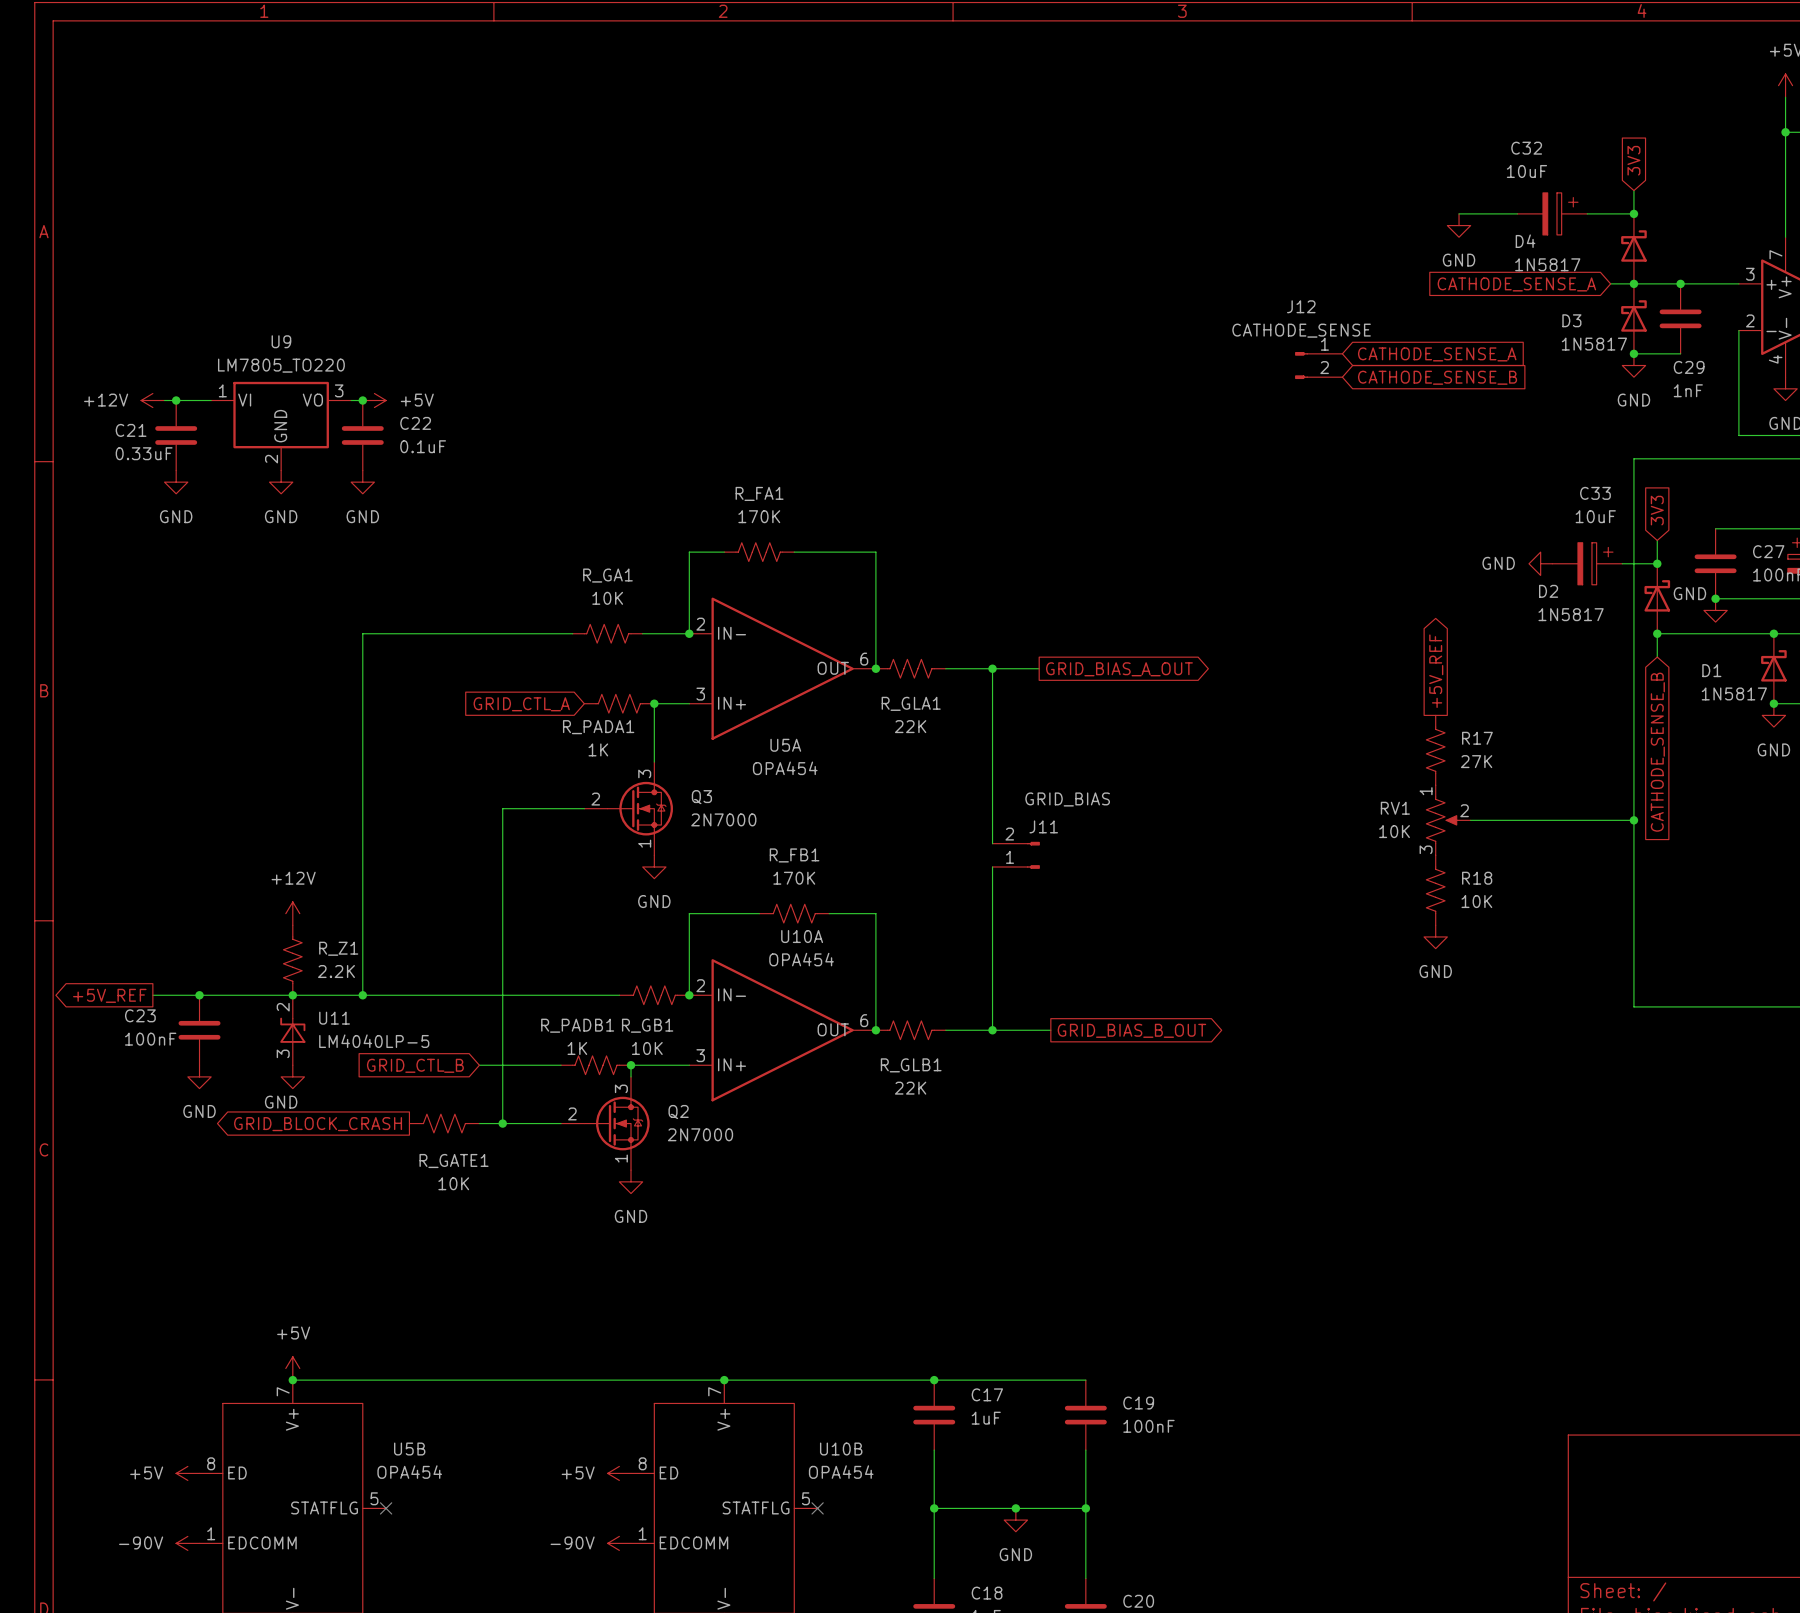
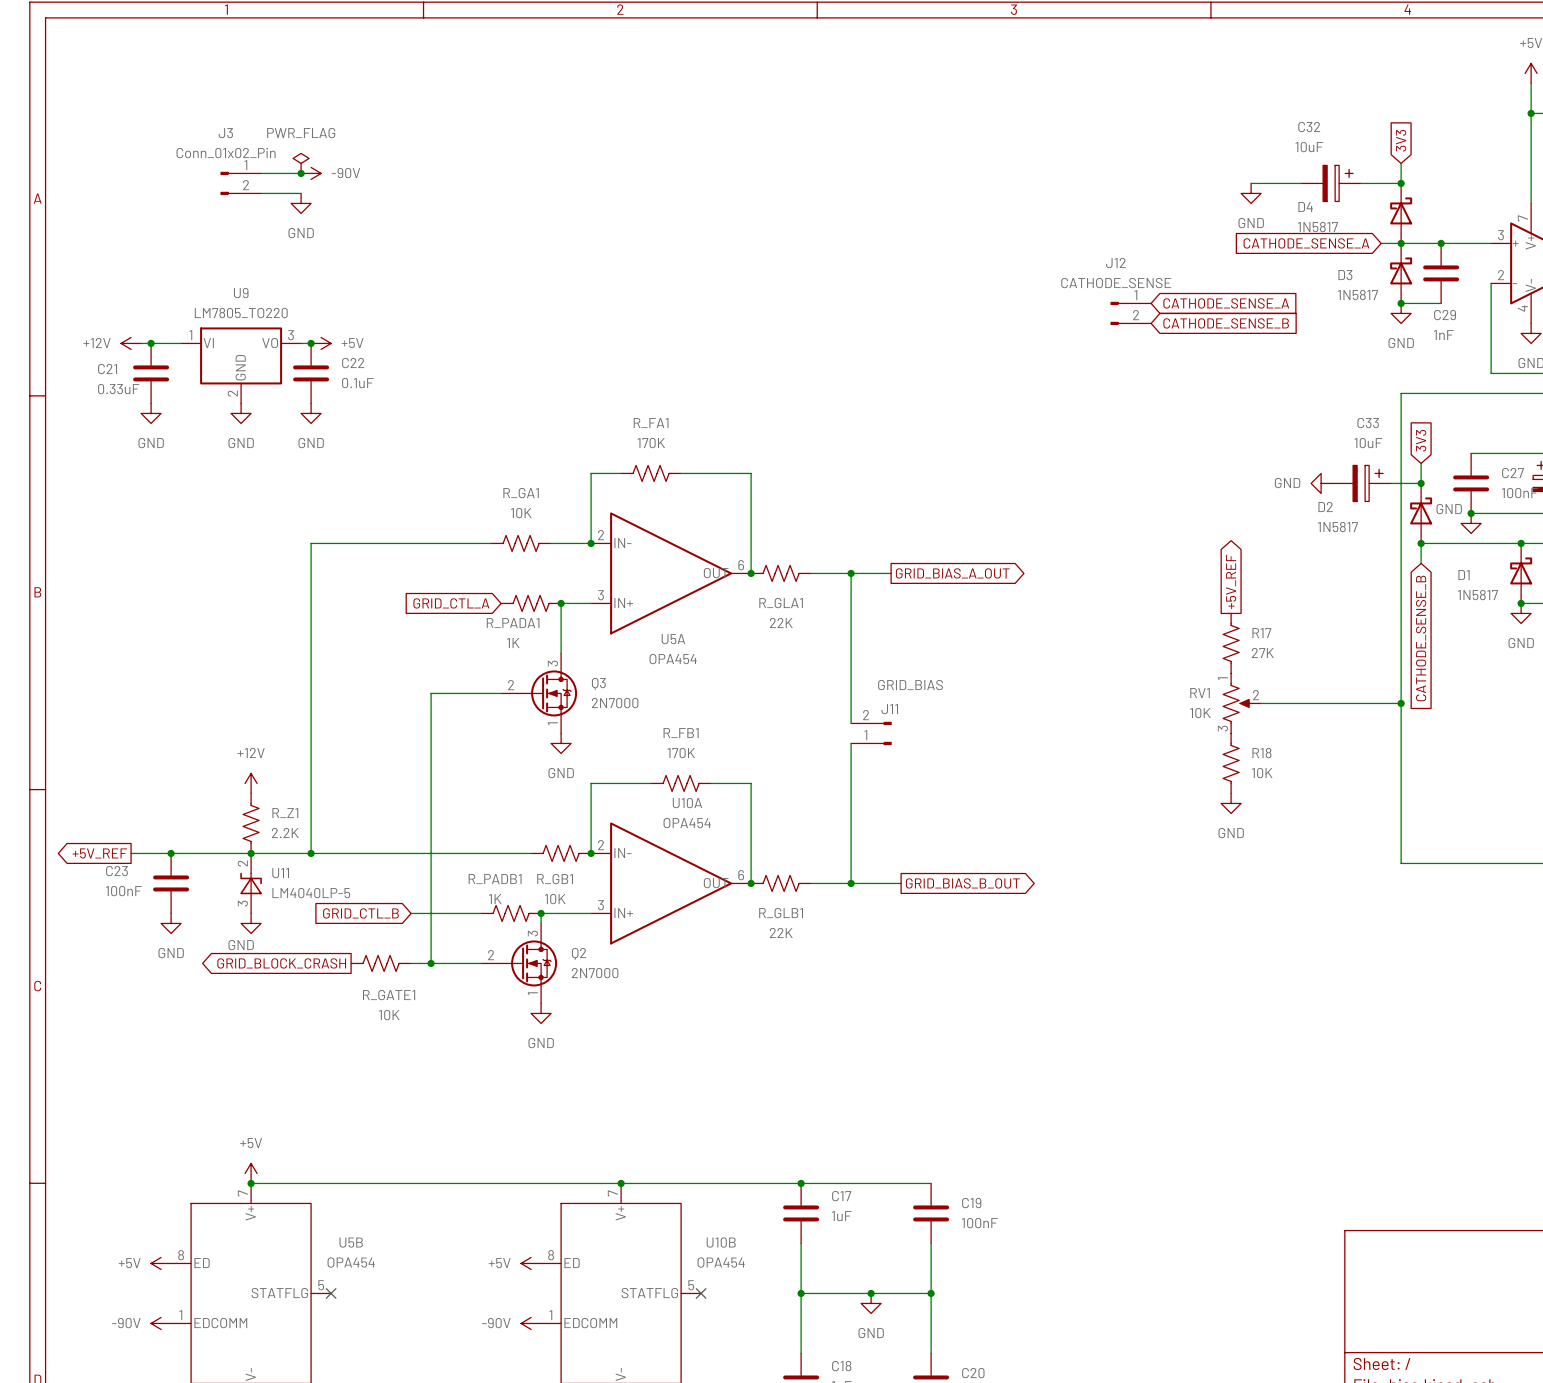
power symbol: none -> PWR_FLAG (301, 163)
wire: none -> (261, 173) (301, 173)
junction: none -> (301, 173)
power symbol: none -> -90V (311, 173)
J3: none -> Conn_01x02_Pin (240, 183)
wire: none -> (261, 193) (301, 193)
power symbol: none -> GND (301, 203)

